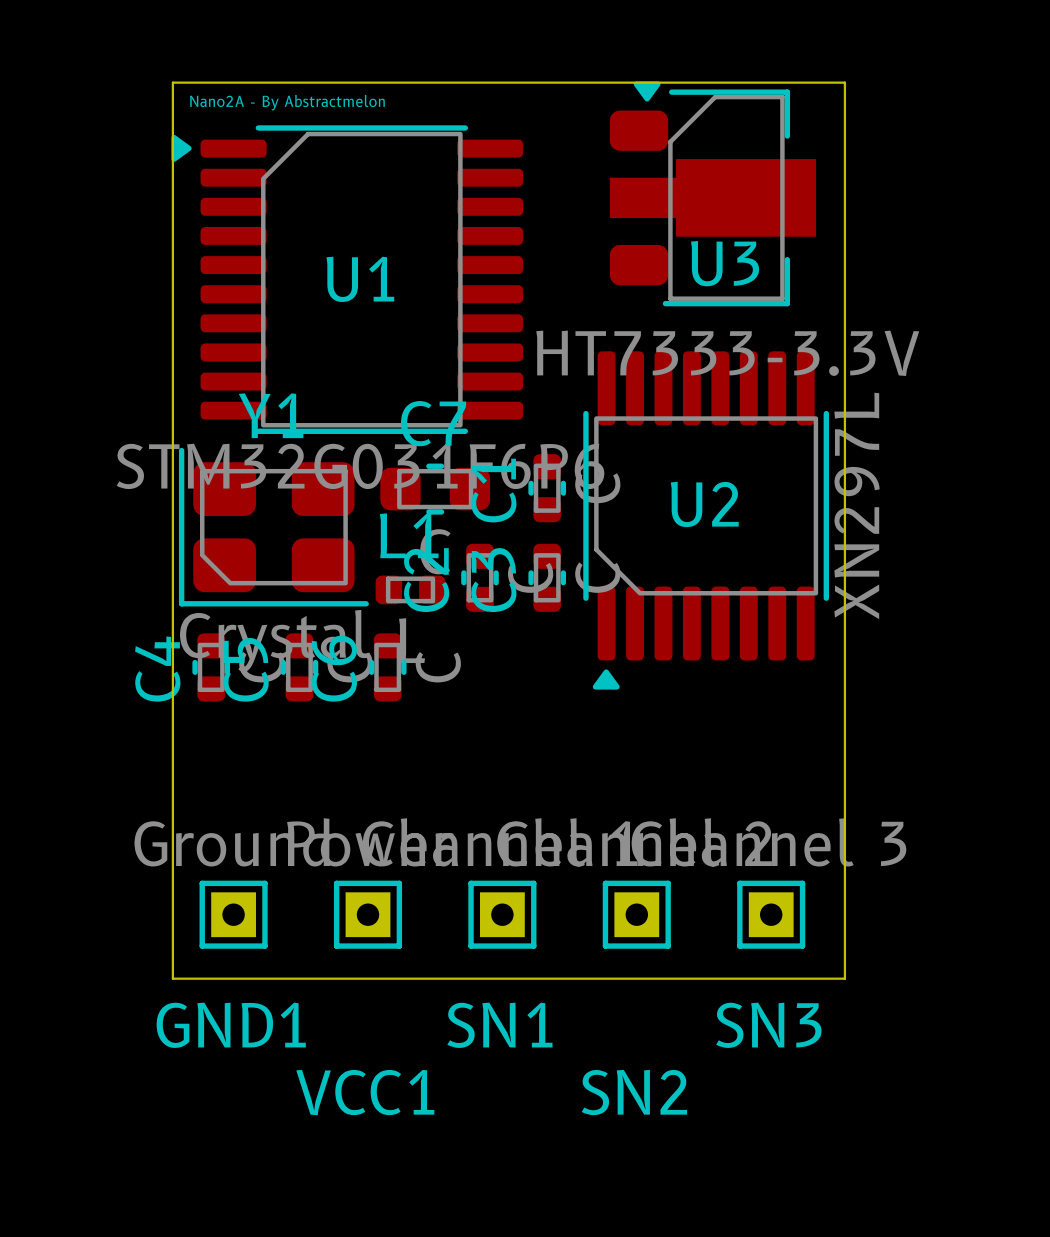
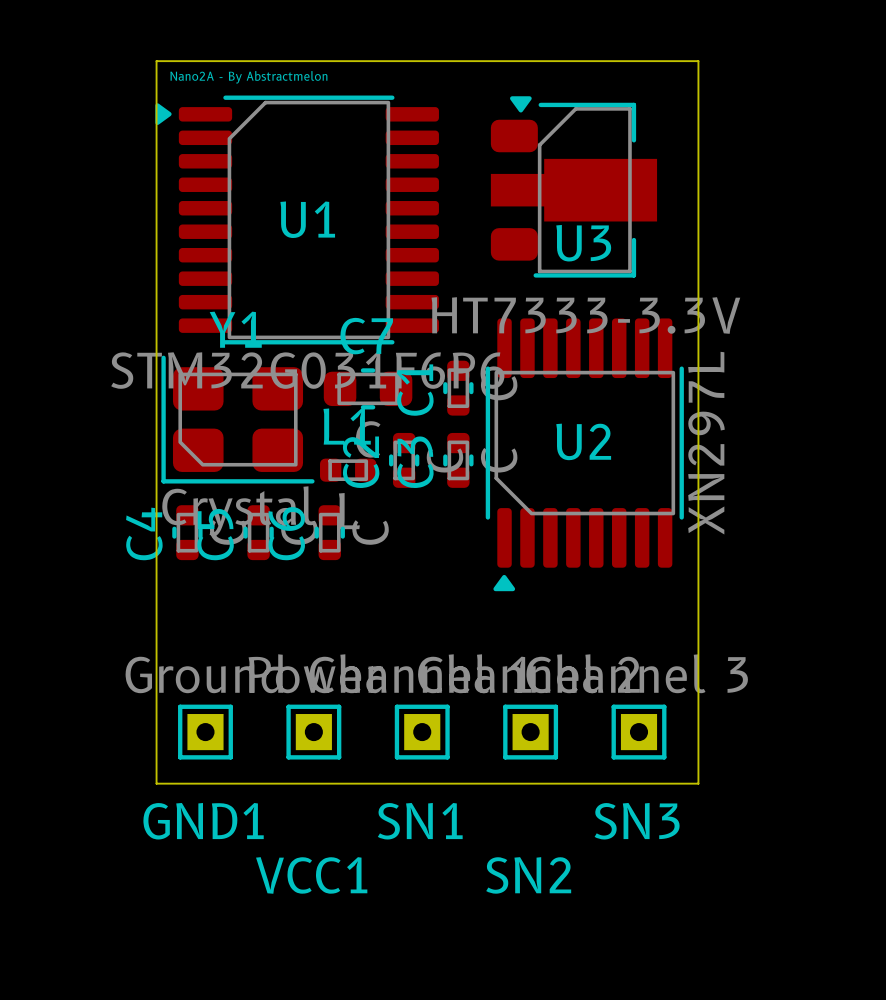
U3 position: (712, 193) -> (573, 186)
U2 position: (706, 520) -> (584, 454)

